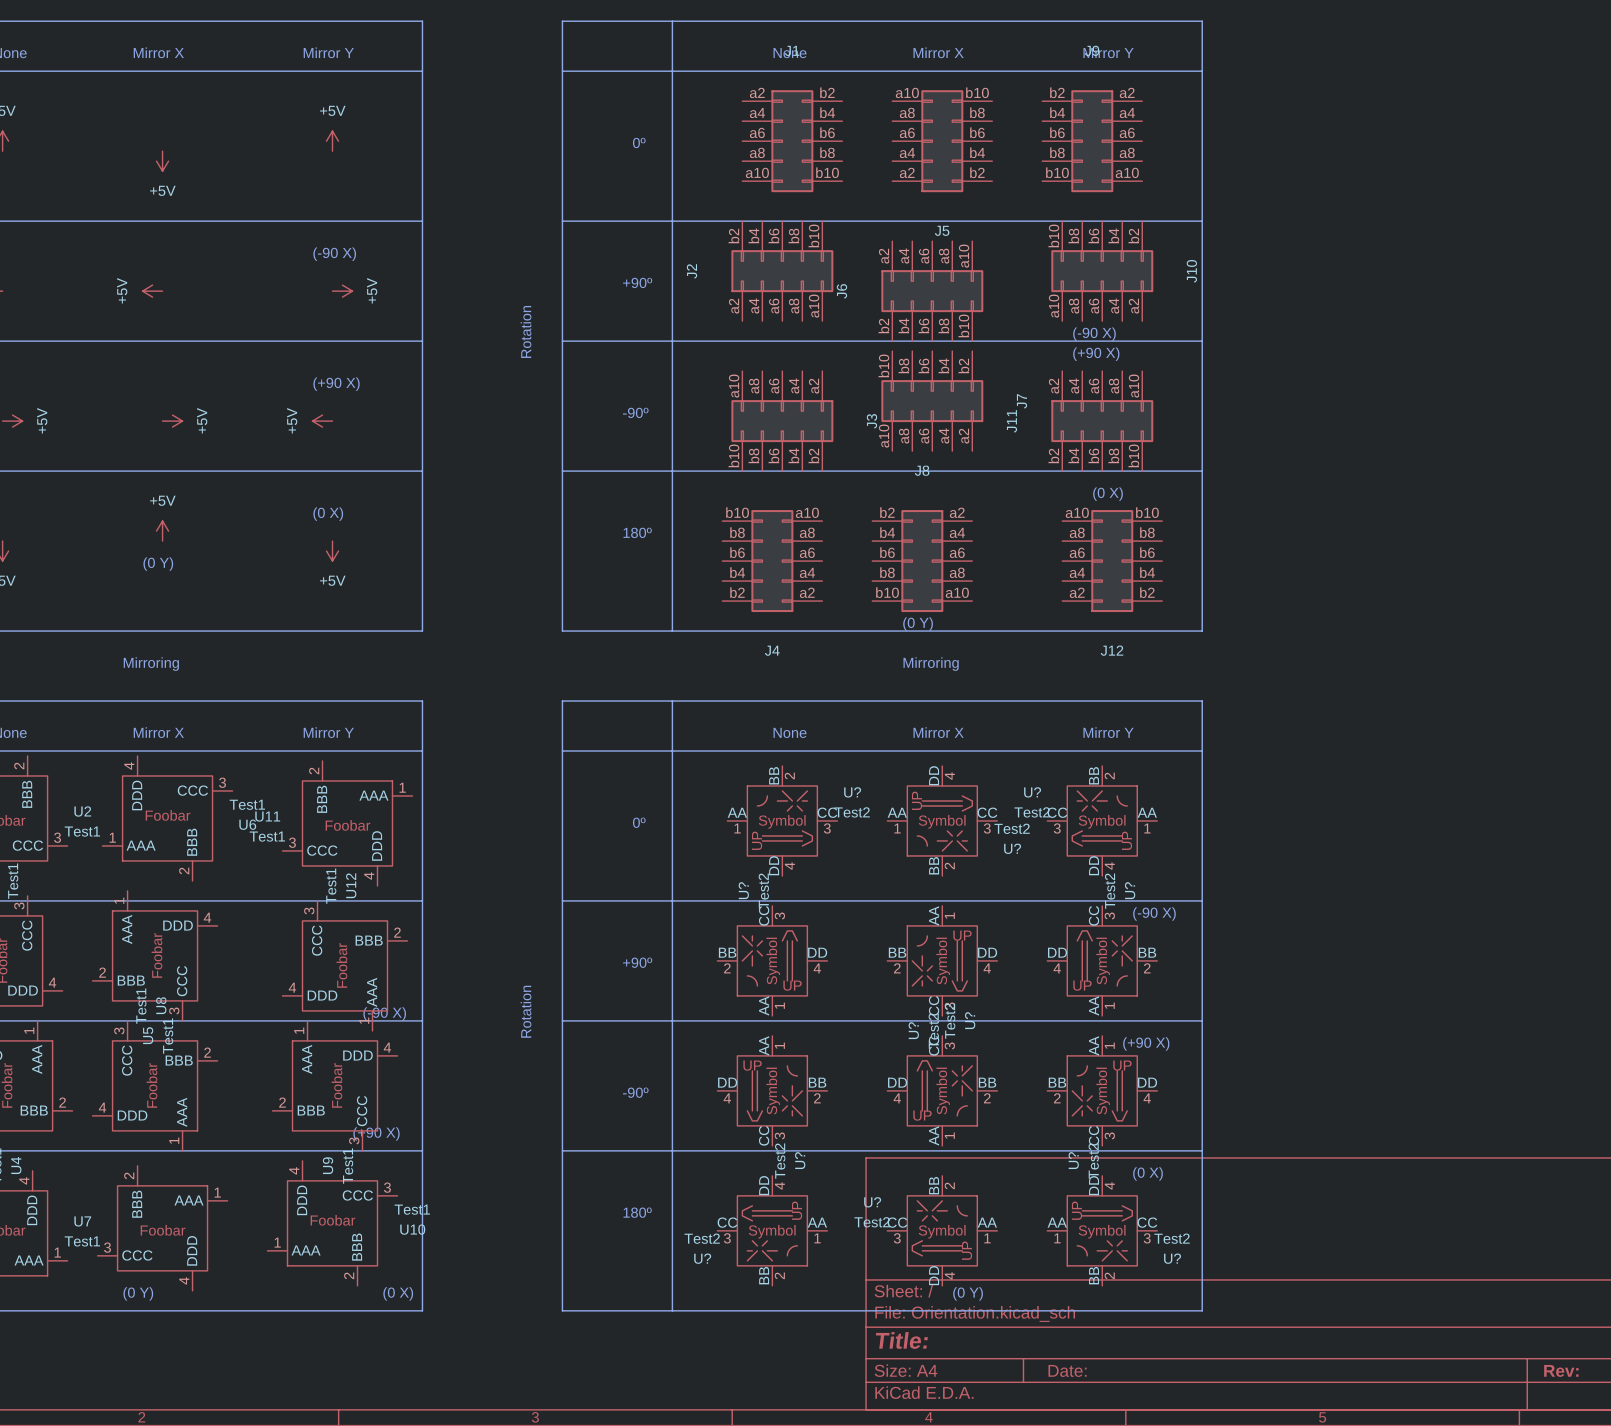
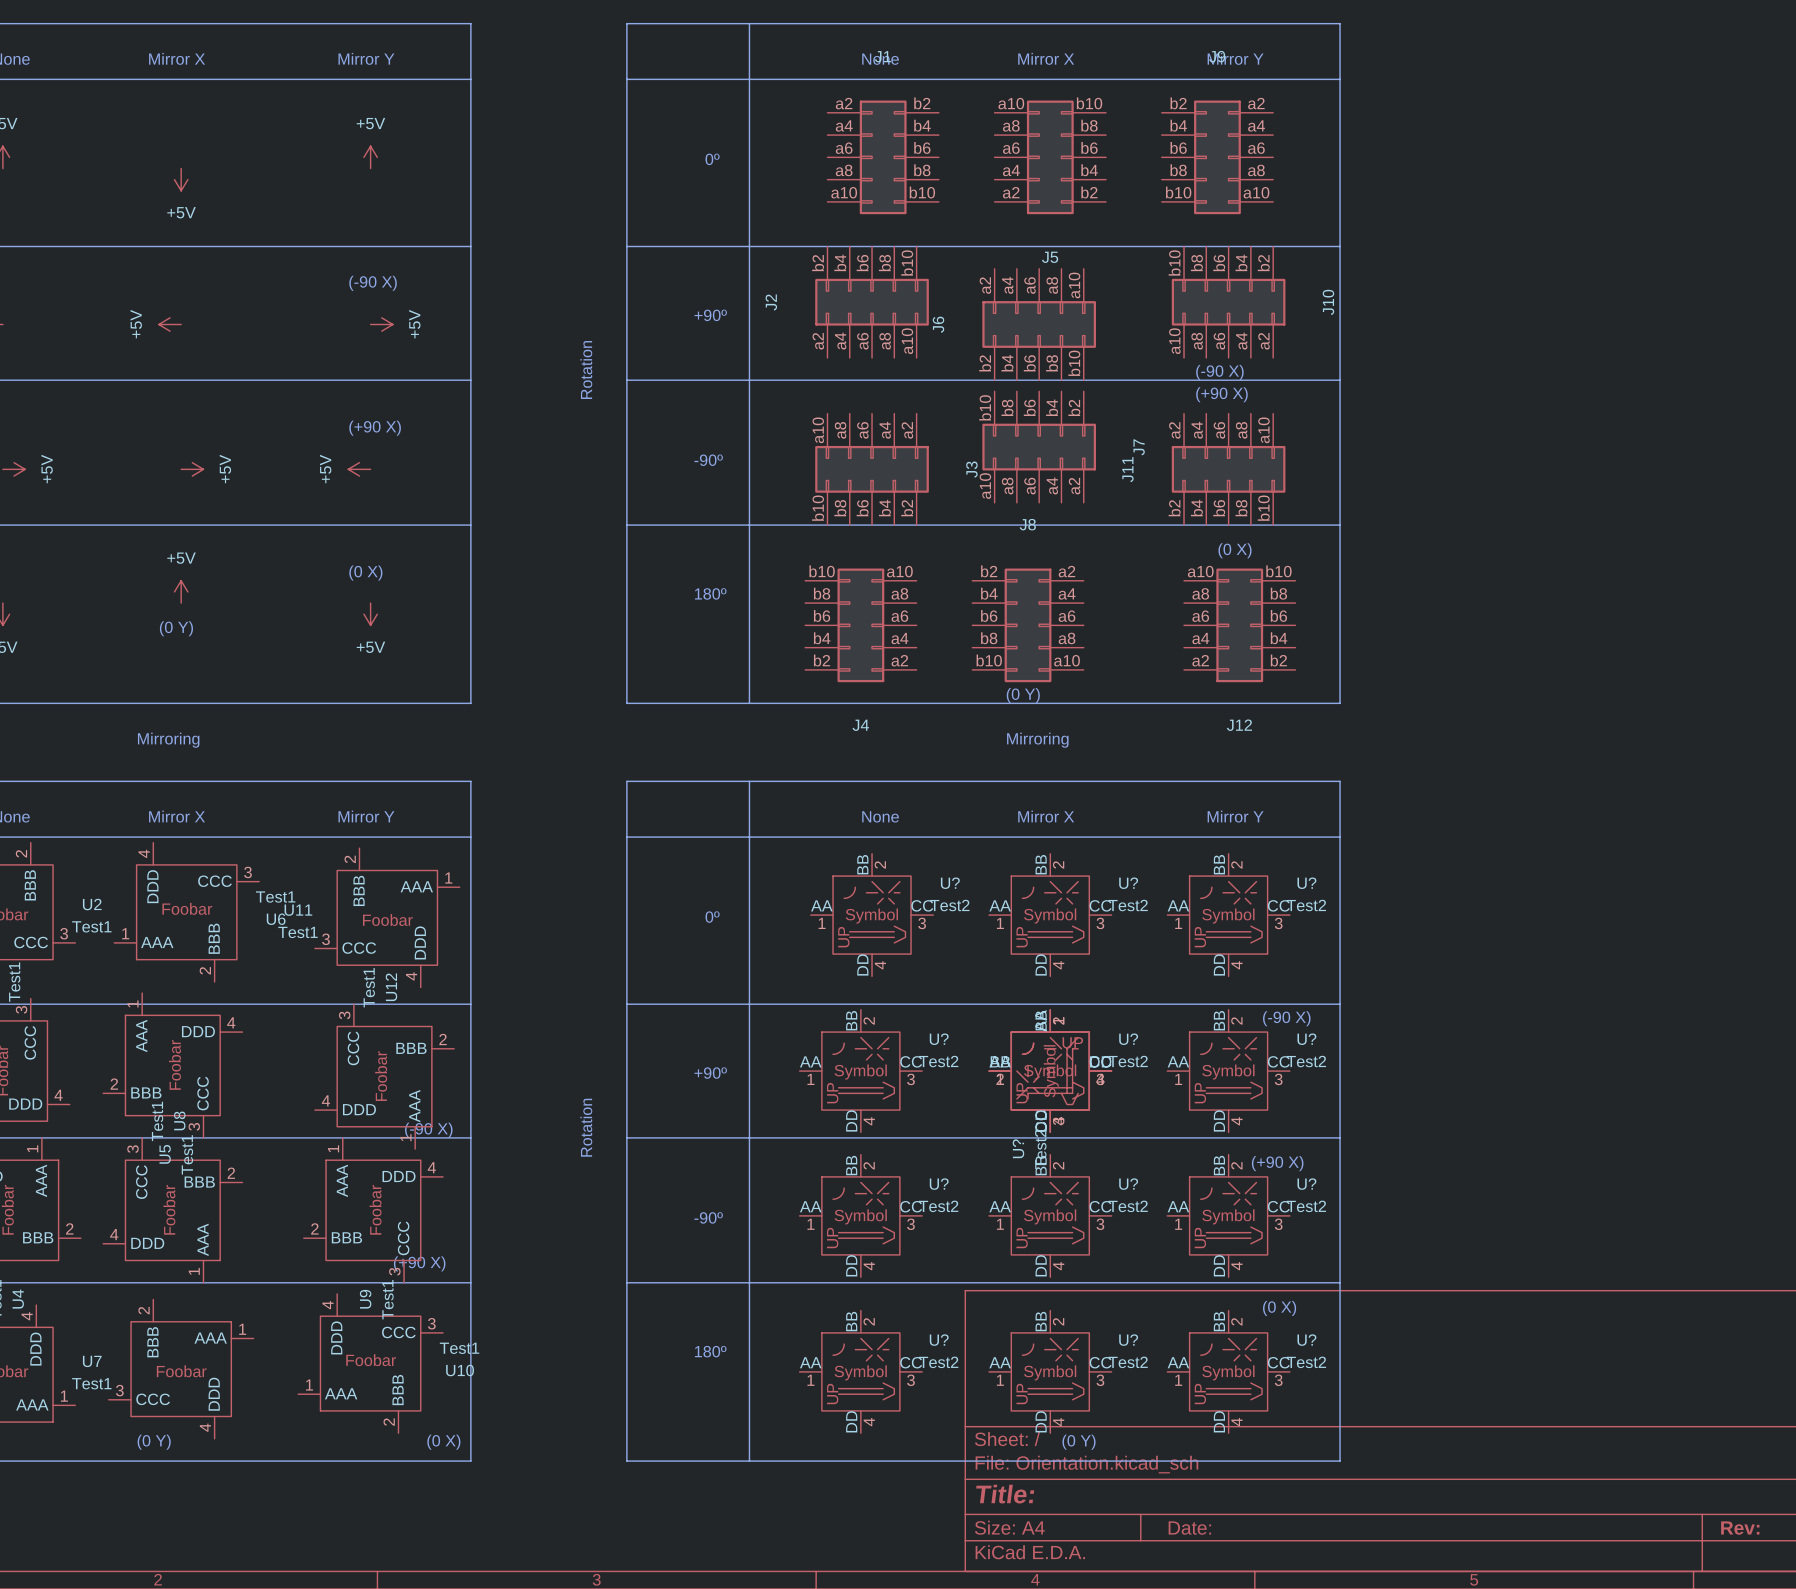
U?: Test2 (942, 810) -> none
U?: none -> Test2 (1050, 926)
U? flip: as is (1102, 840) -> left-right (1228, 937)
U? rotation: 0° (792, 960) -> 90° clockwise (860, 1093)
U?: Test2 (1092, 960) -> none
U?: none -> Test2 (1050, 1082)
U?: none -> Test2 (1228, 1082)
U? rotation: 0° (752, 1090) -> 90° counterclockwise (860, 1238)
U?: Test2 (932, 1090) -> none
U?: Test2 (1112, 1090) -> none
U?: none -> Test2 (1050, 1227)
U?: none -> Test2 (1228, 1227)
U? rotation: 0° (772, 1210) -> 180° (860, 1394)
U?: Test2 (1102, 1220) -> none
U?: none -> Test2 (1228, 1383)
U? flip: as is (942, 1250) -> left-right (1050, 1394)

